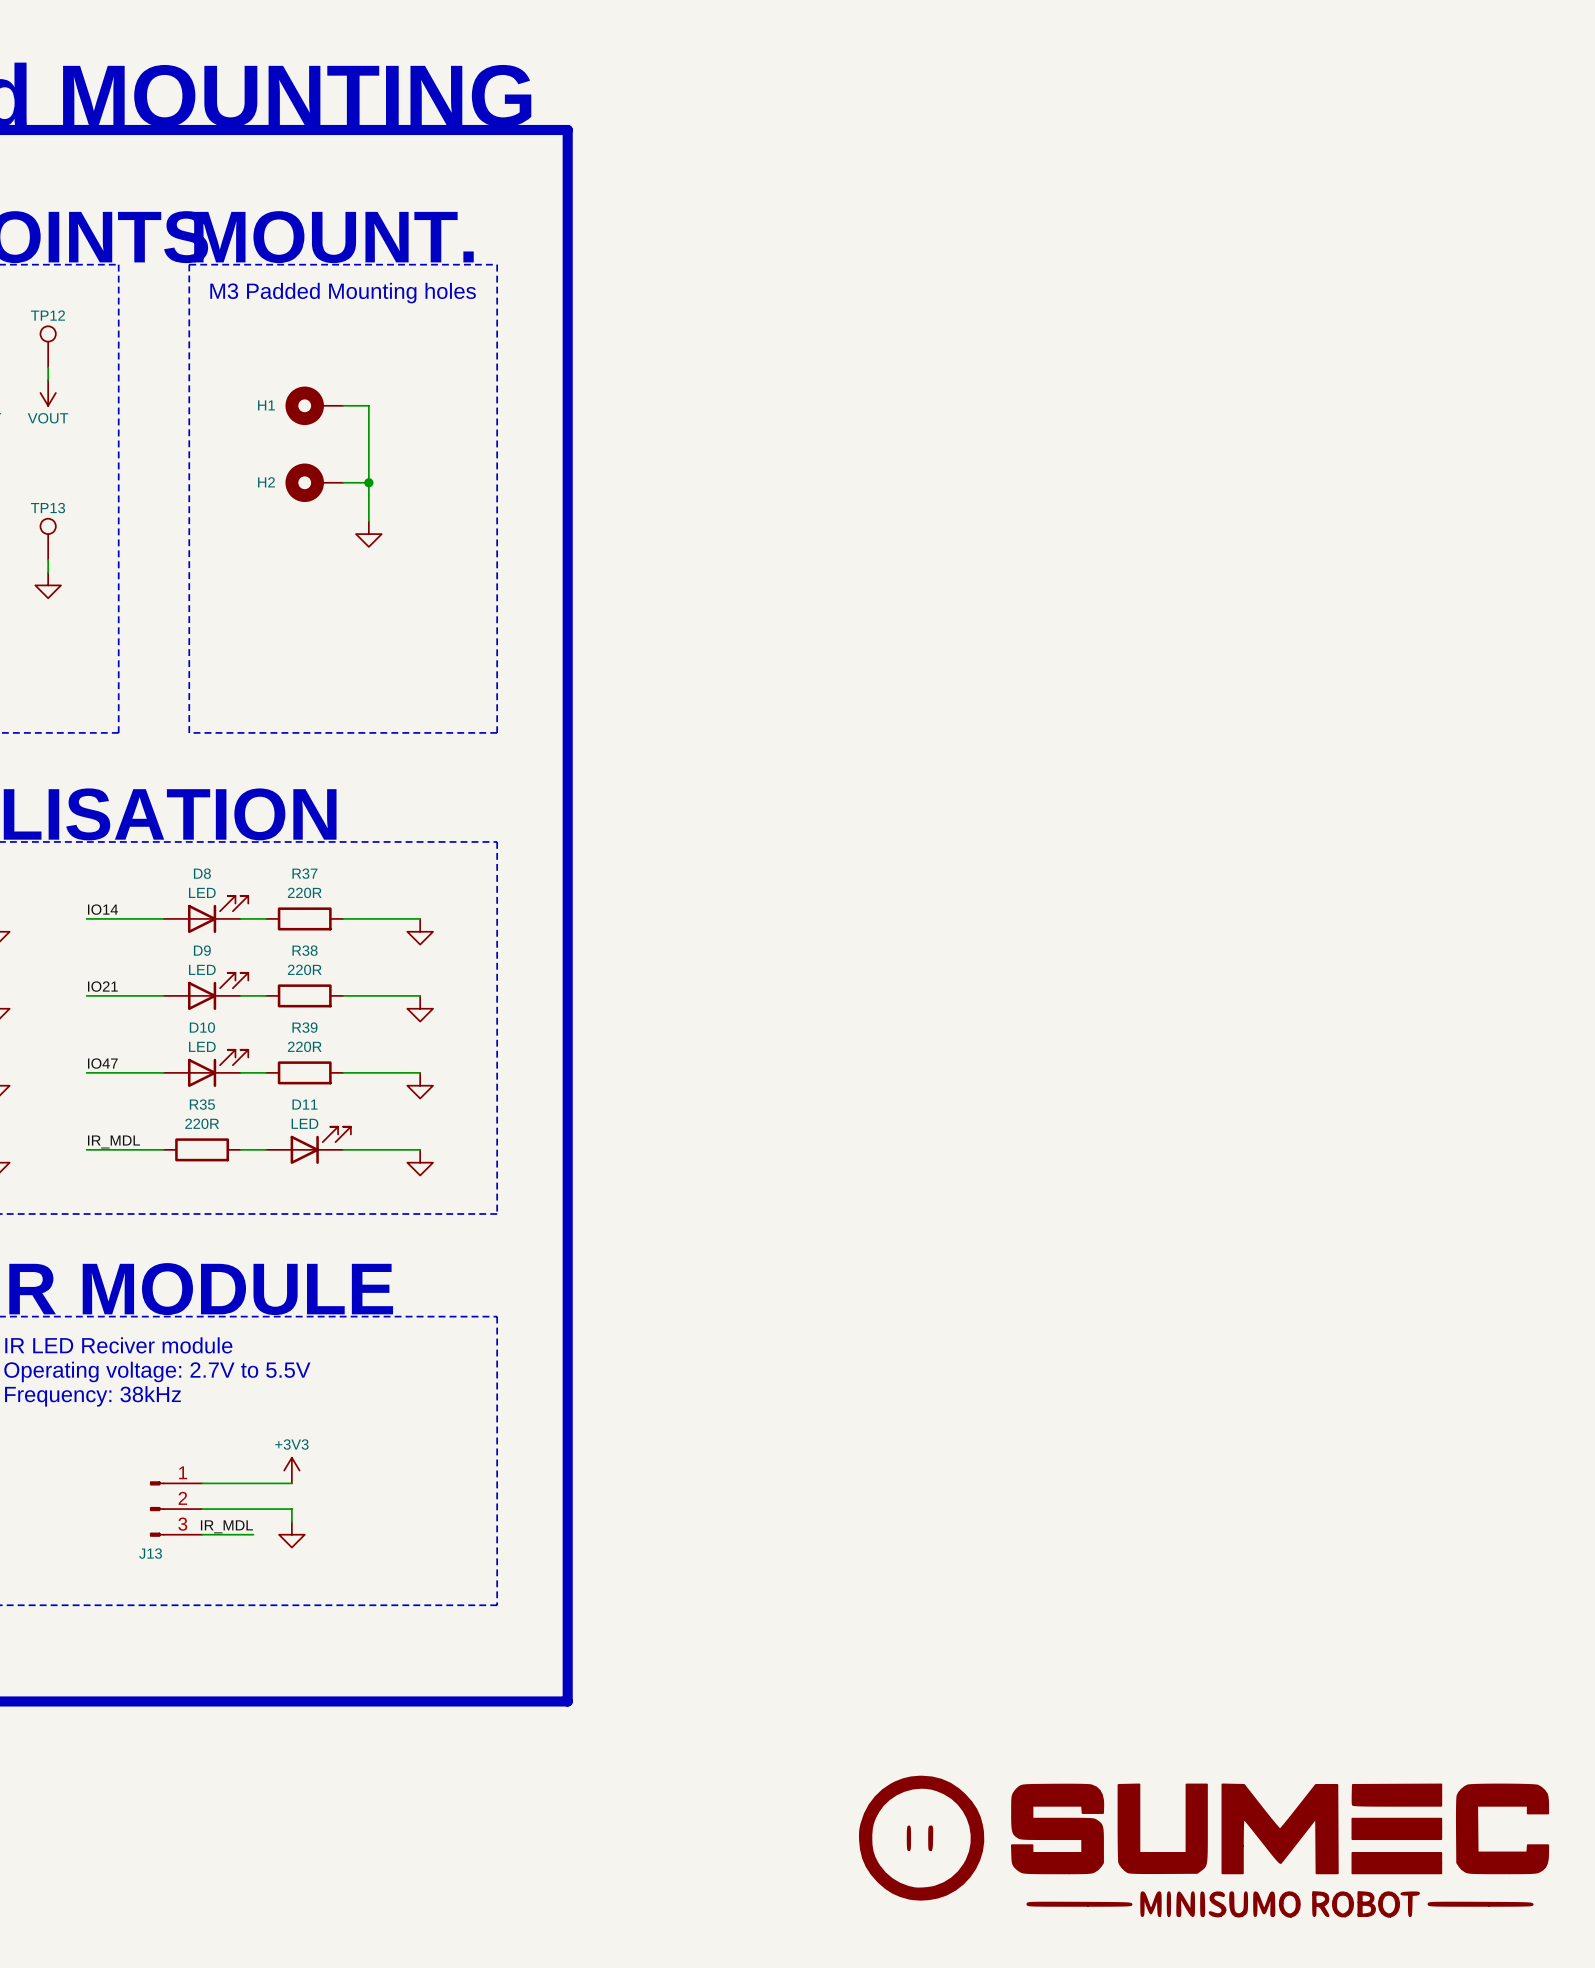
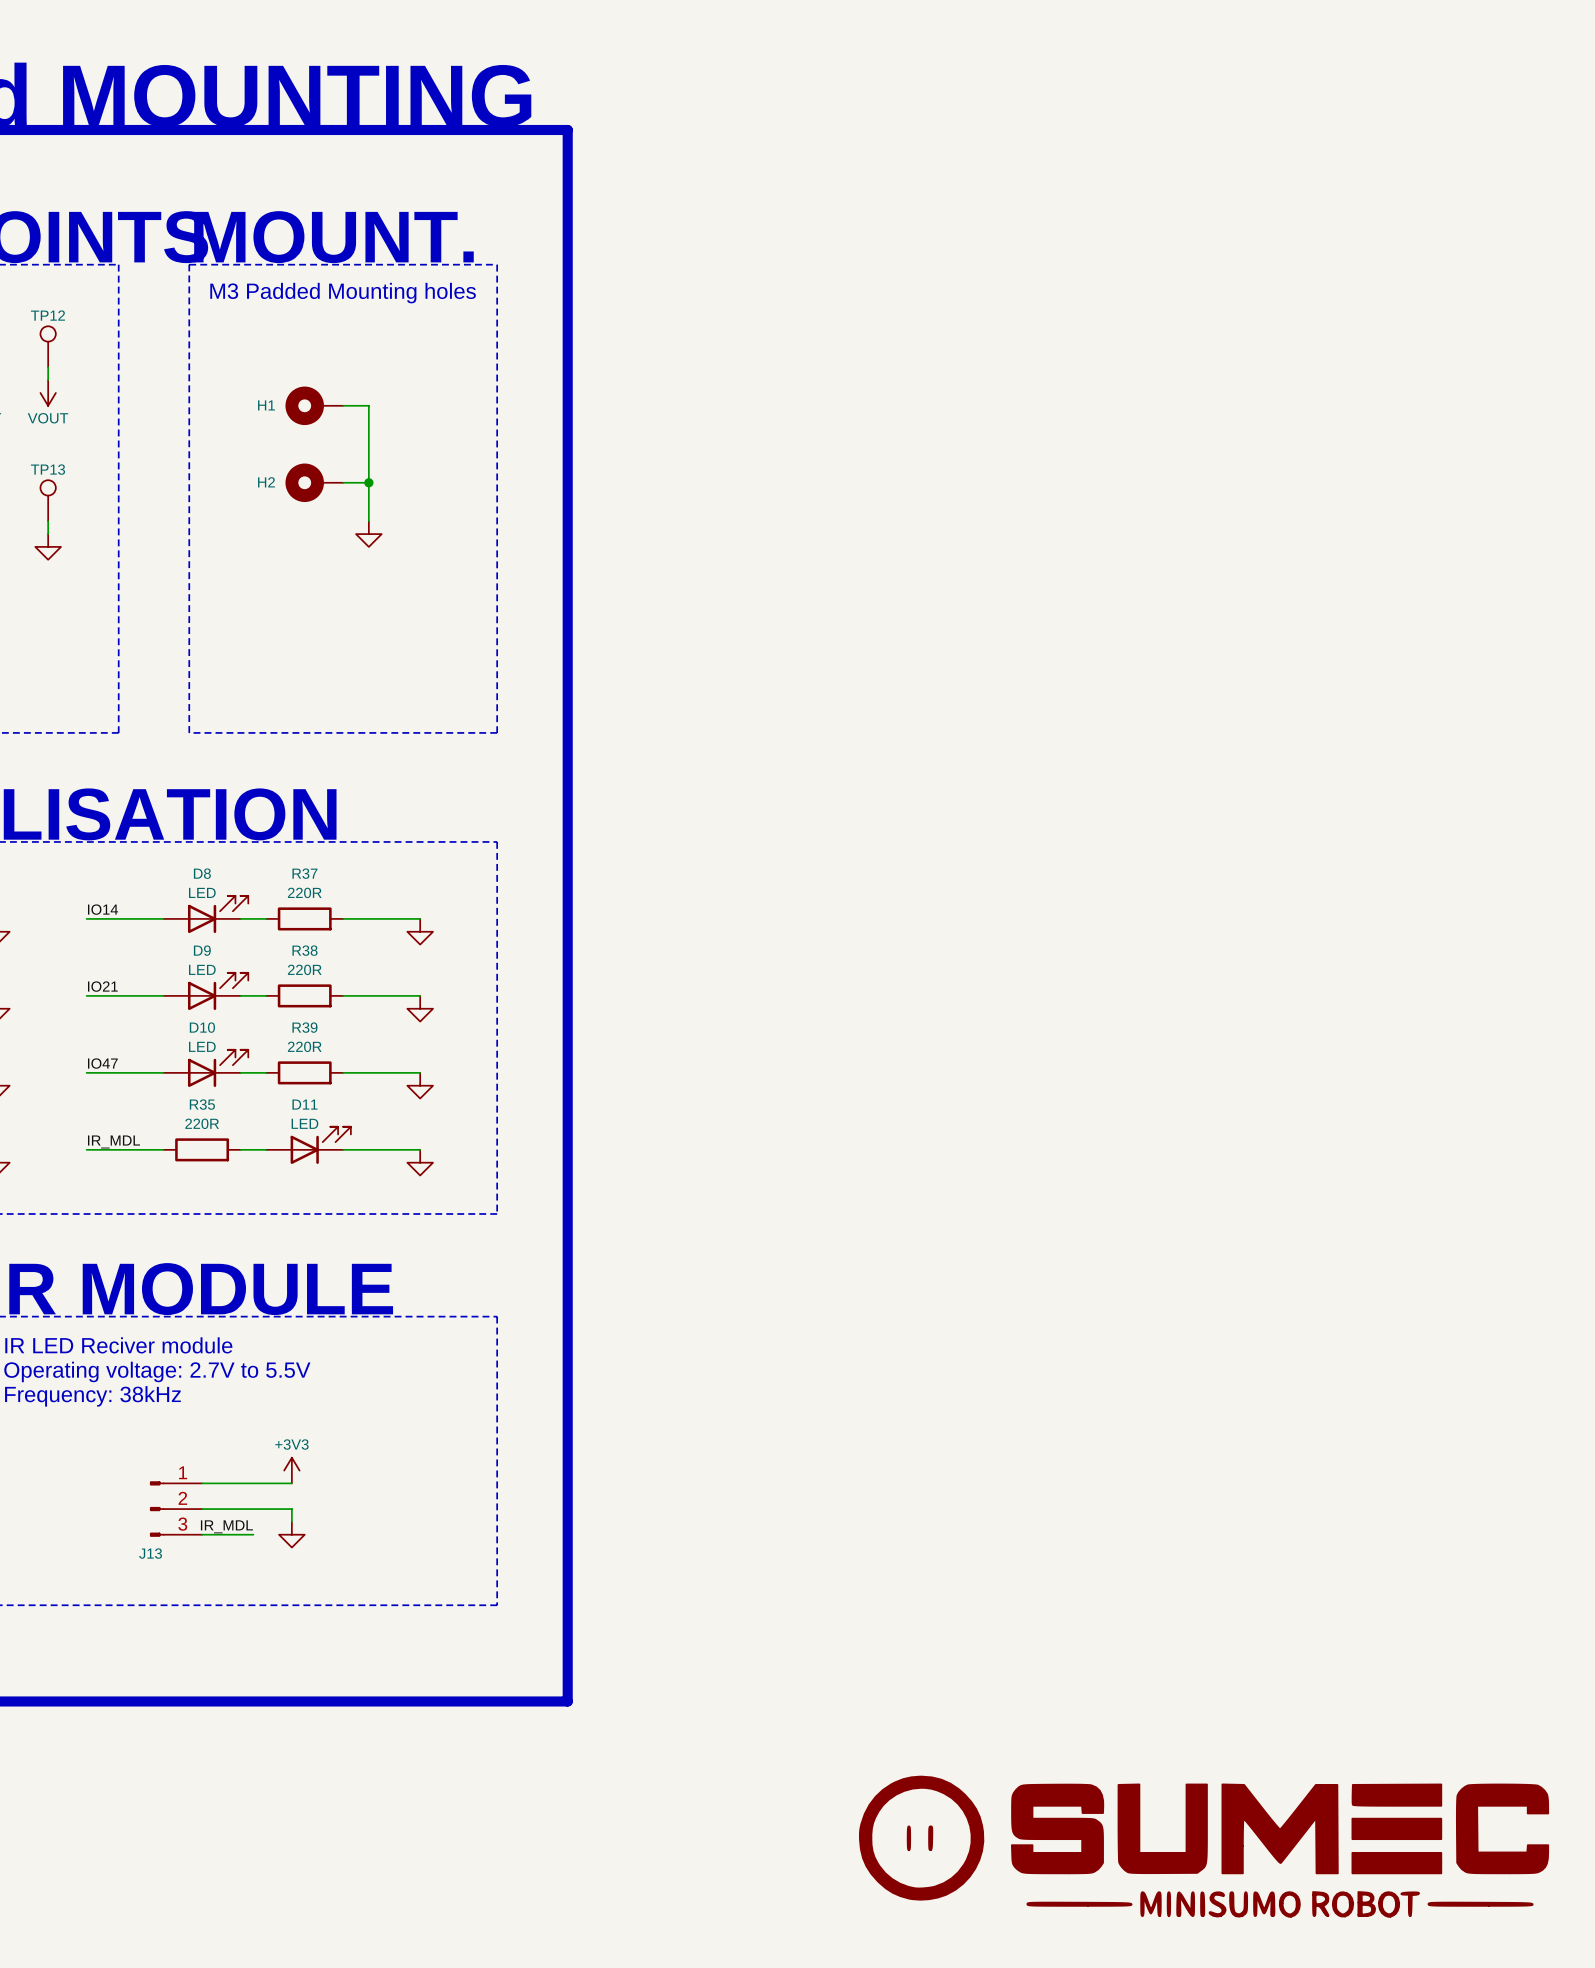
TP13 position: (48, 539) -> (48, 500)
wire: (48, 559) (48, 572) -> (48, 521) (48, 534)
power symbol position: (48, 585) -> (48, 546)

